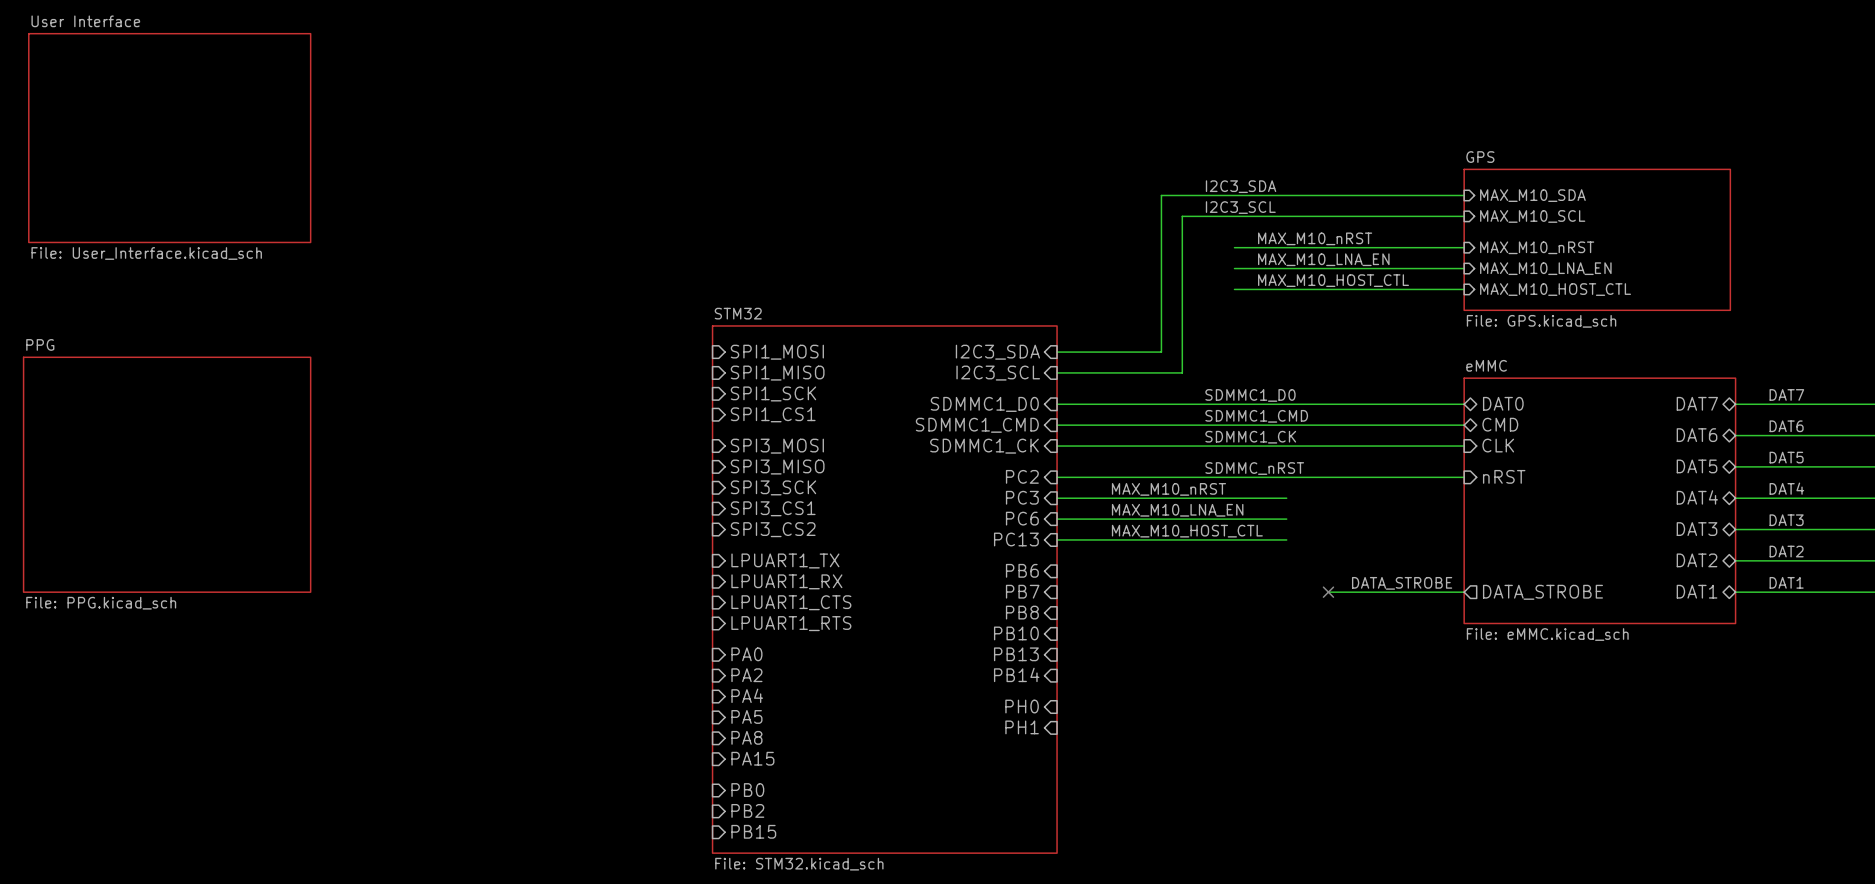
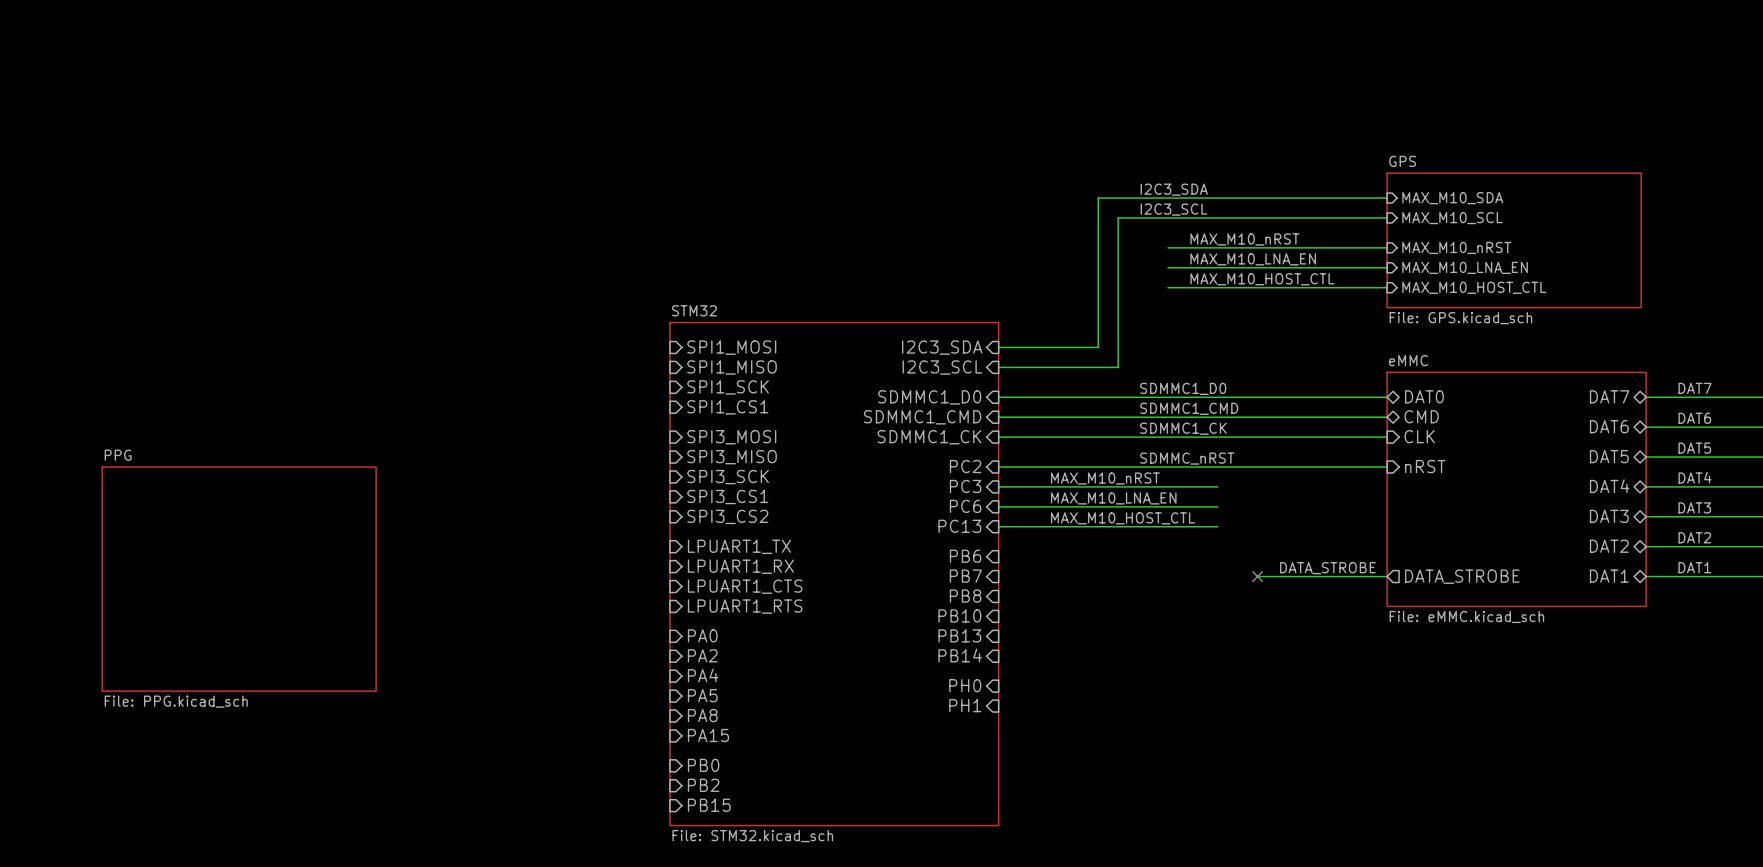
sheet User Interface: File: User_Interface.kicad_sch (169, 138) -> none
sheet PPG position: (167, 474) -> (239, 579)

